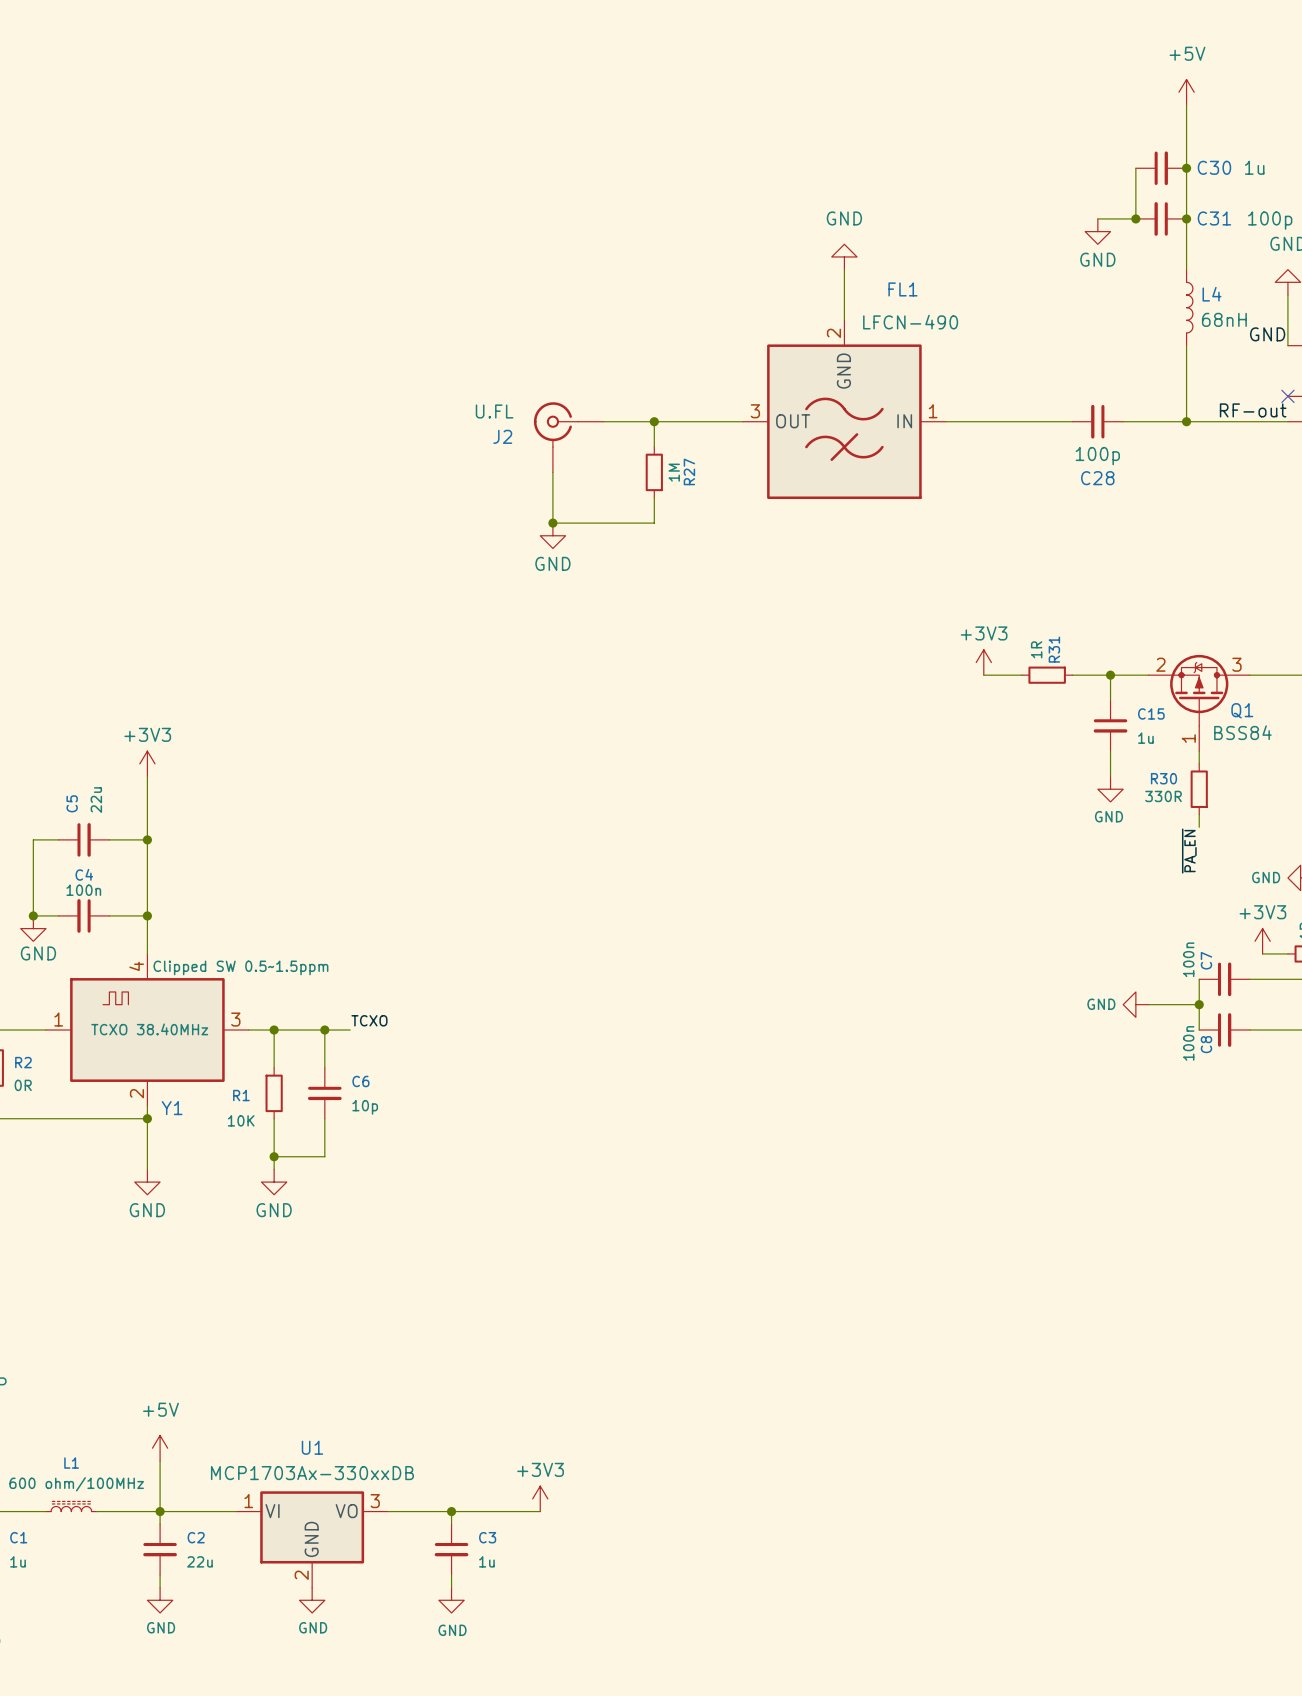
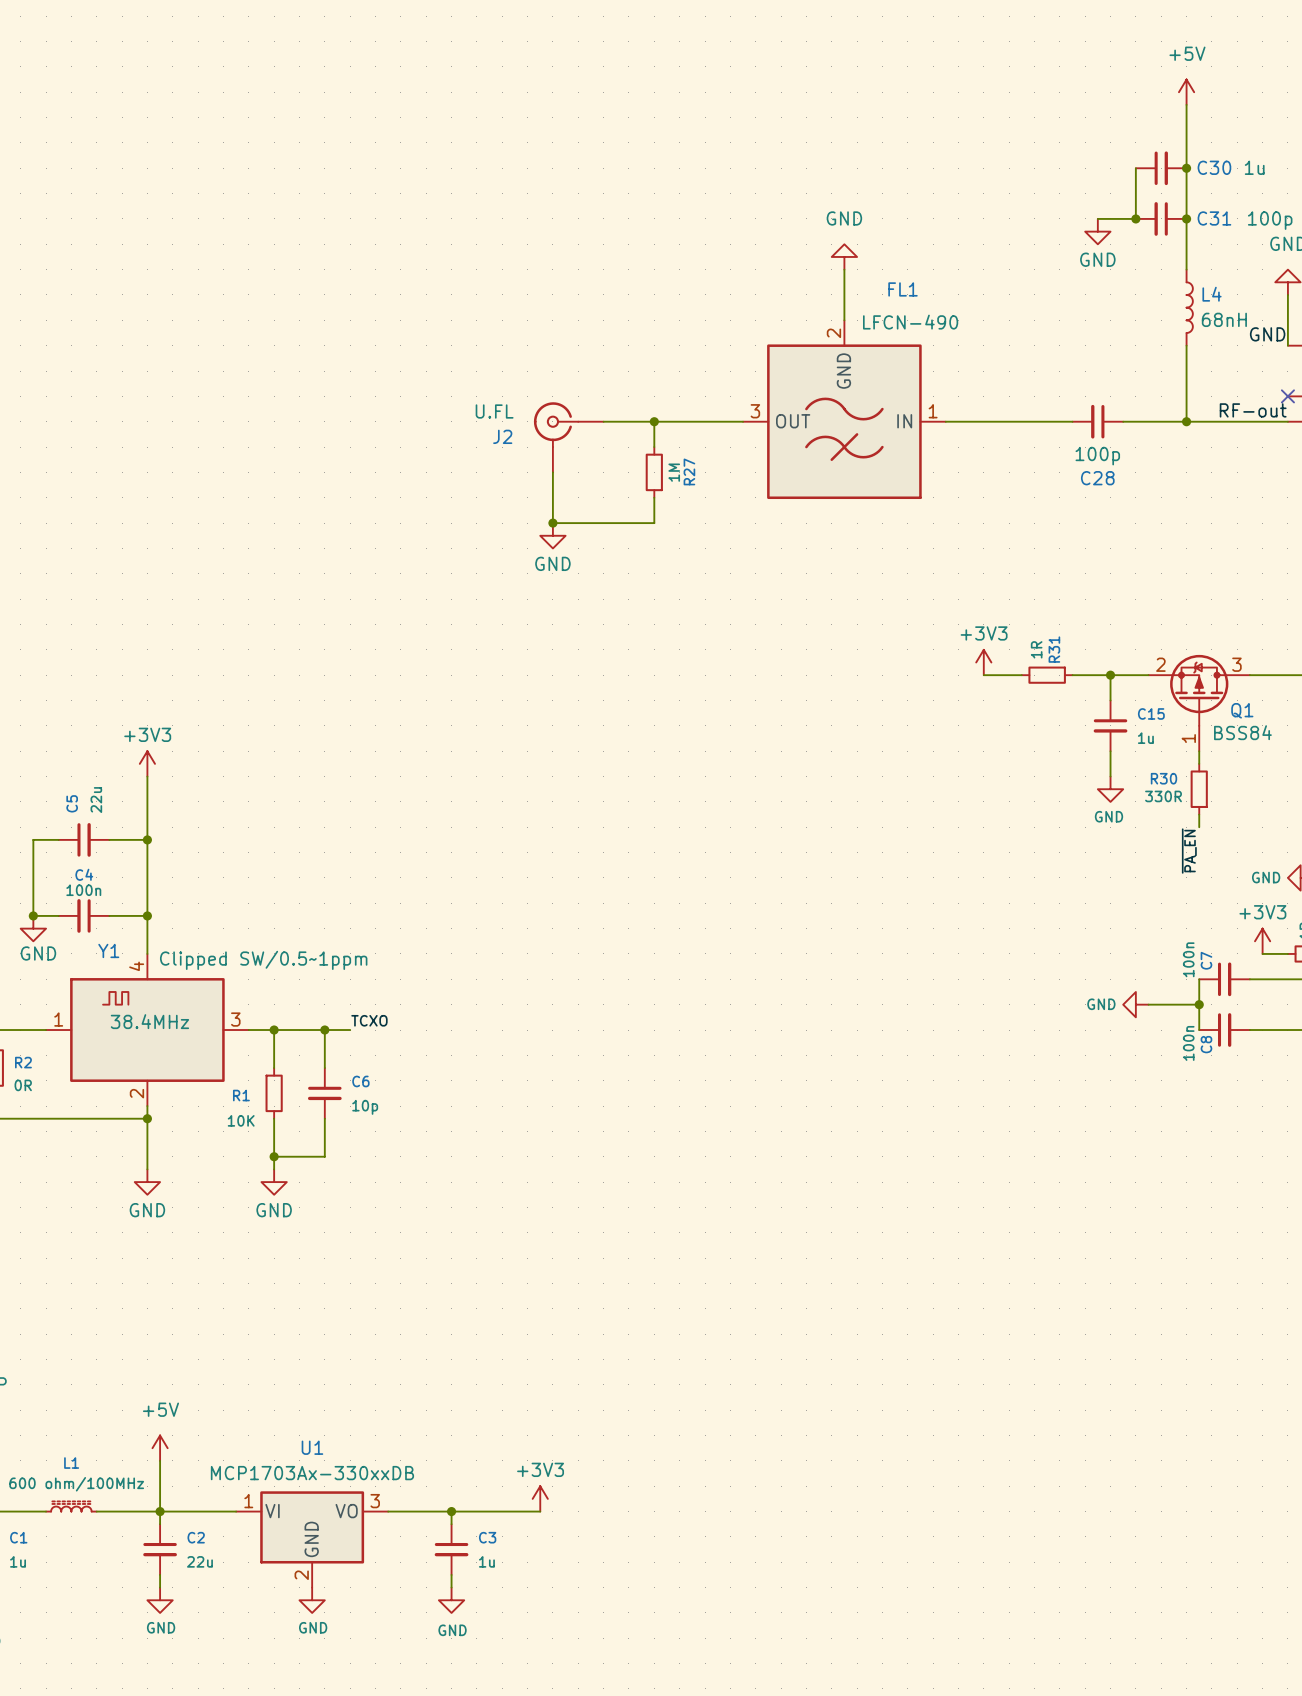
Y1 text: Clipped SW 0.5~1.5ppm (240, 967) -> Clipped SW/0.5~1ppm (263, 960)
Y1 value: TCXO 38.40MHz (149, 1029) -> 38.4MHz (149, 1021)
Y1 name position: Y1 (172, 1108) -> Y1 (108, 950)

